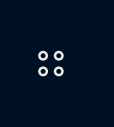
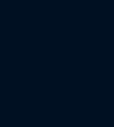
via: (43, 55) -> none
via: (58, 55) -> none
via: (43, 71) -> none
via: (58, 71) -> none

